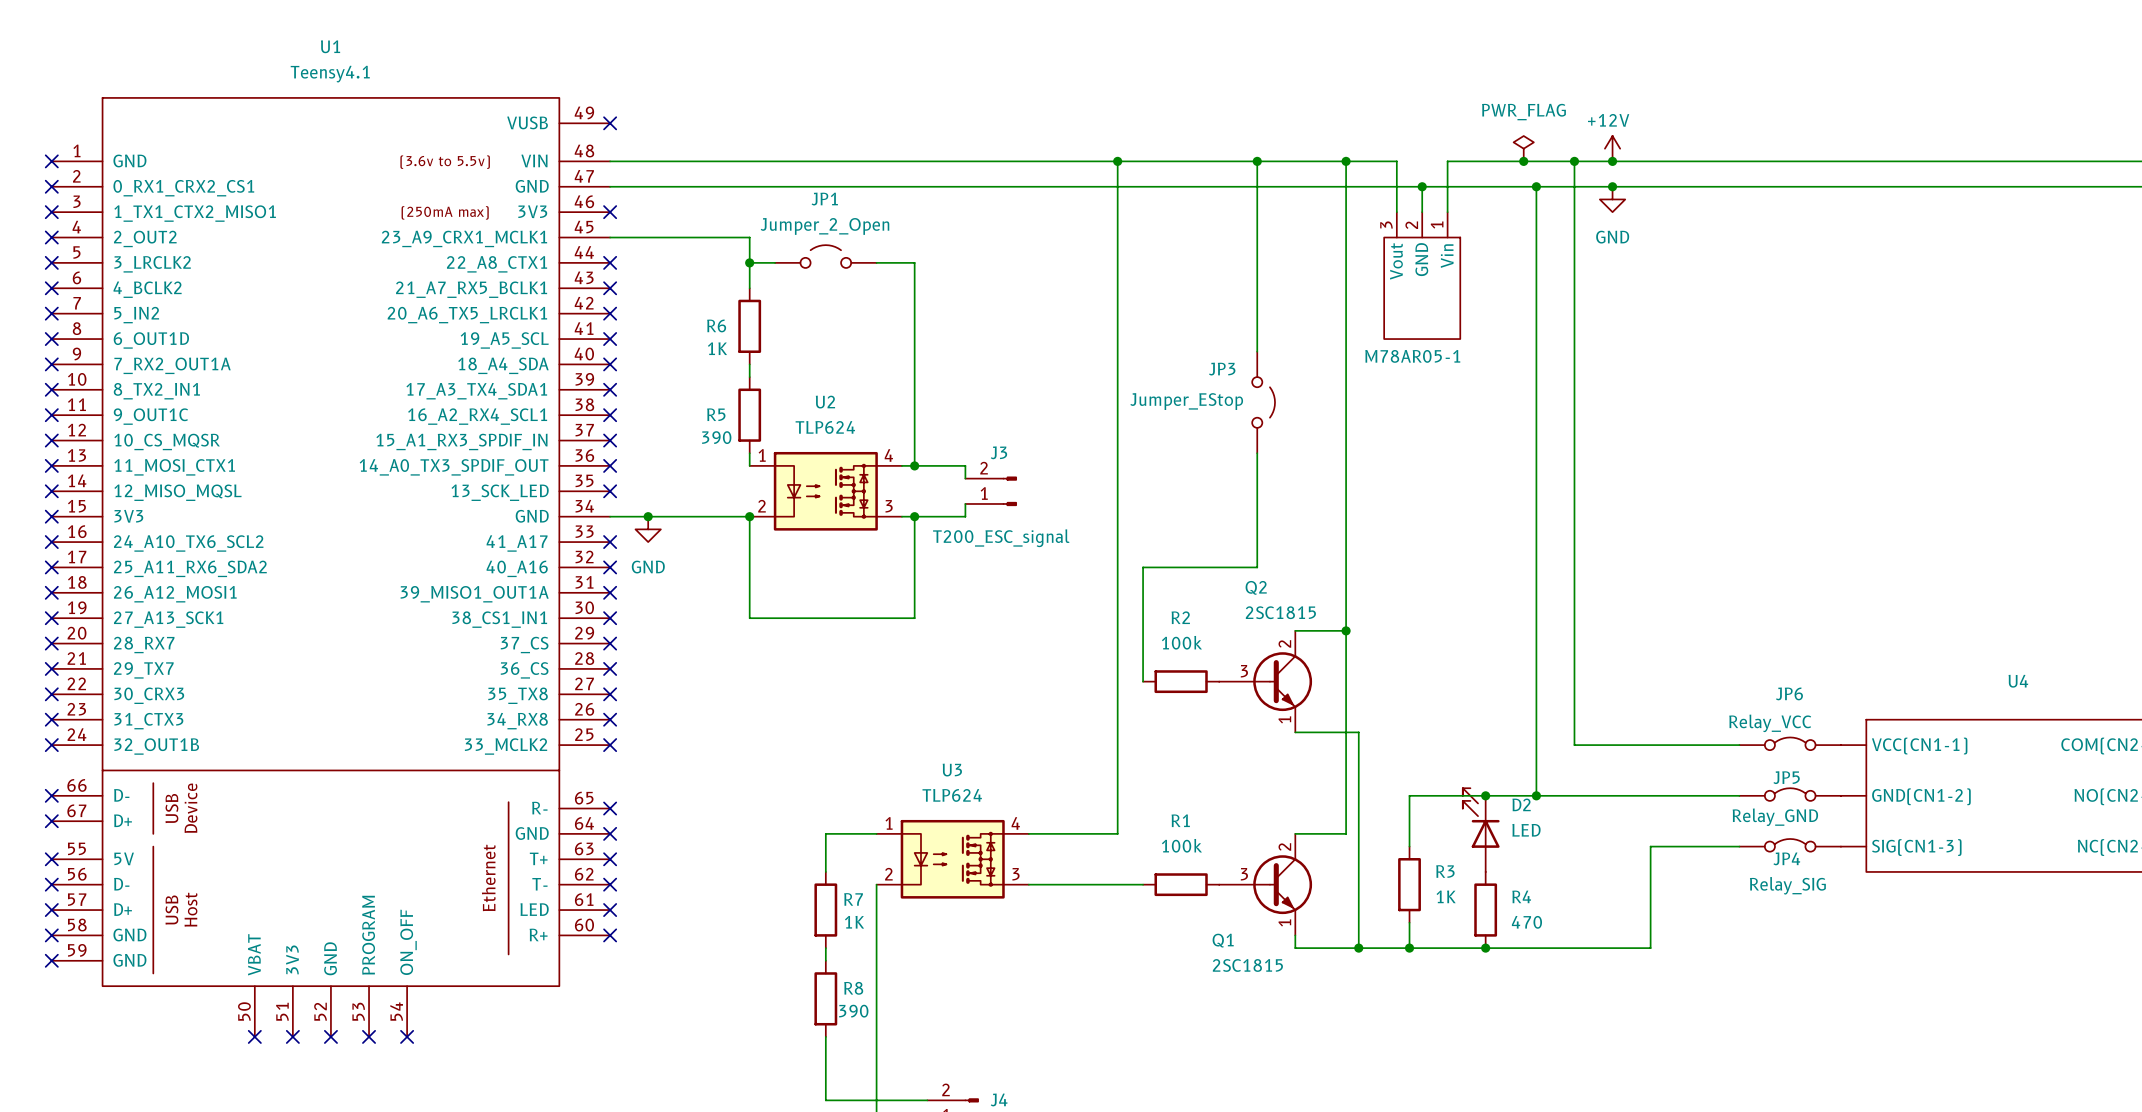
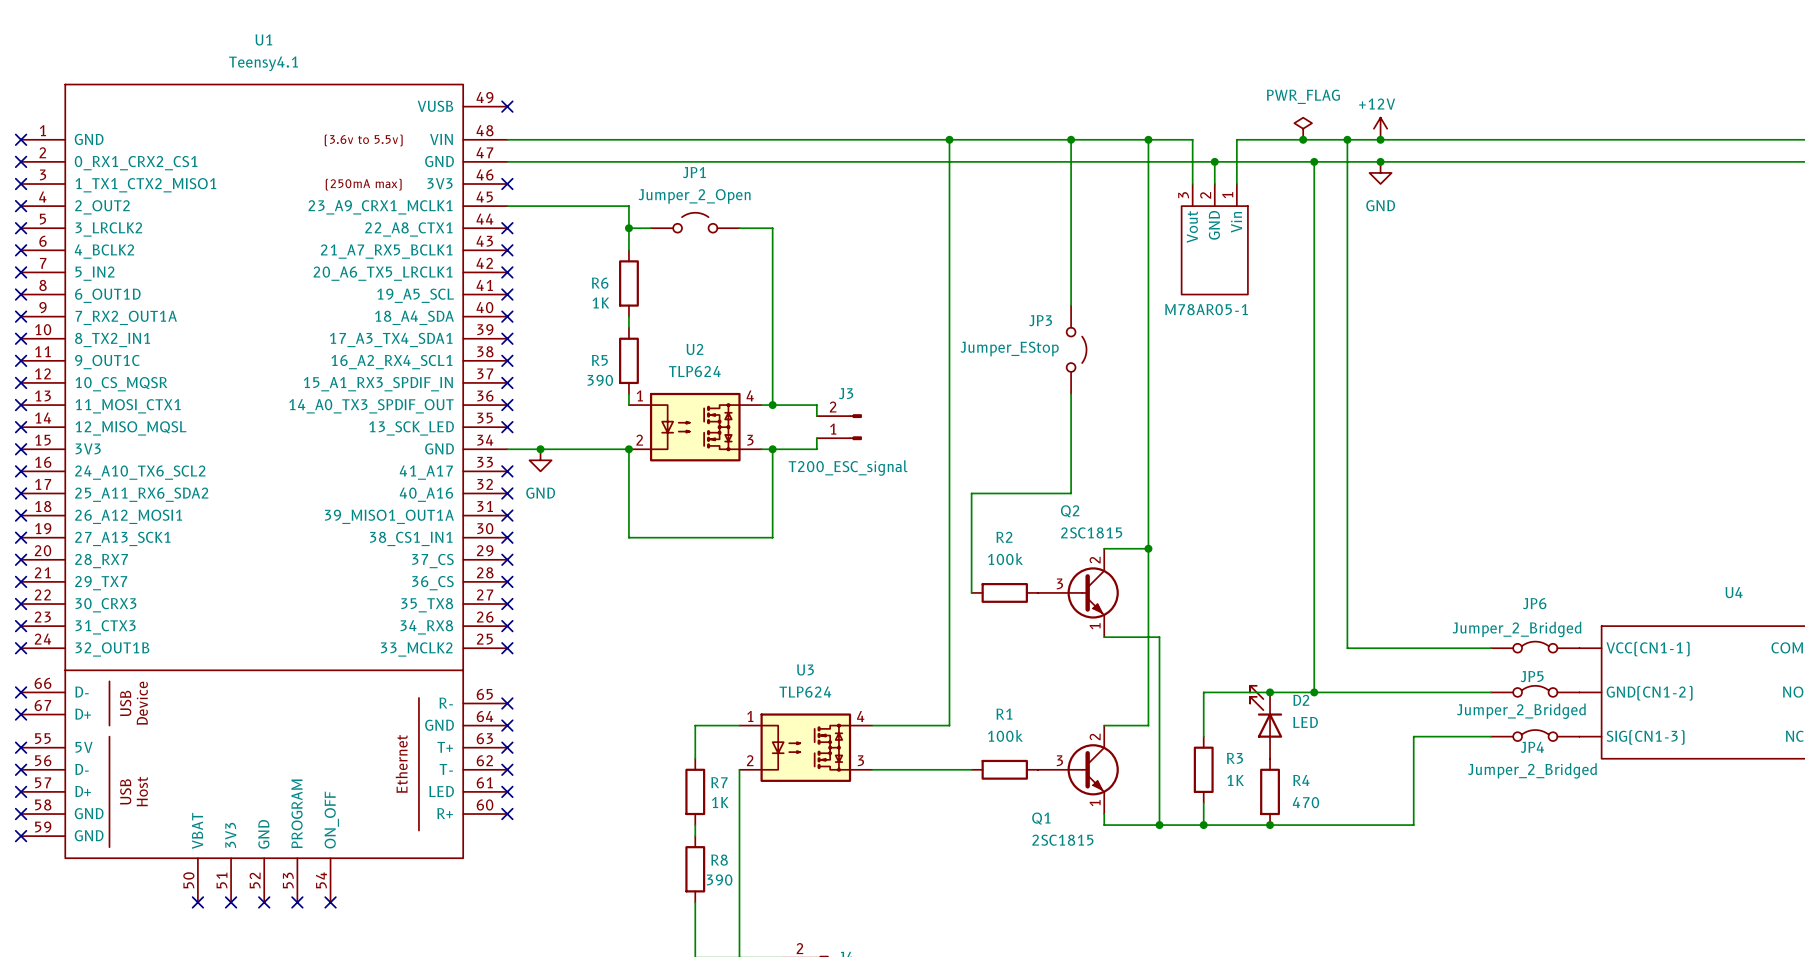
JP6 value: Relay_VCC (1770, 723) -> Jumper_2_Bridged (1516, 629)
JP5 value: Relay_GND (1775, 817) -> Jumper_2_Bridged (1521, 711)
JP4 value: Relay_SIG (1787, 885) -> Jumper_2_Bridged (1532, 770)

